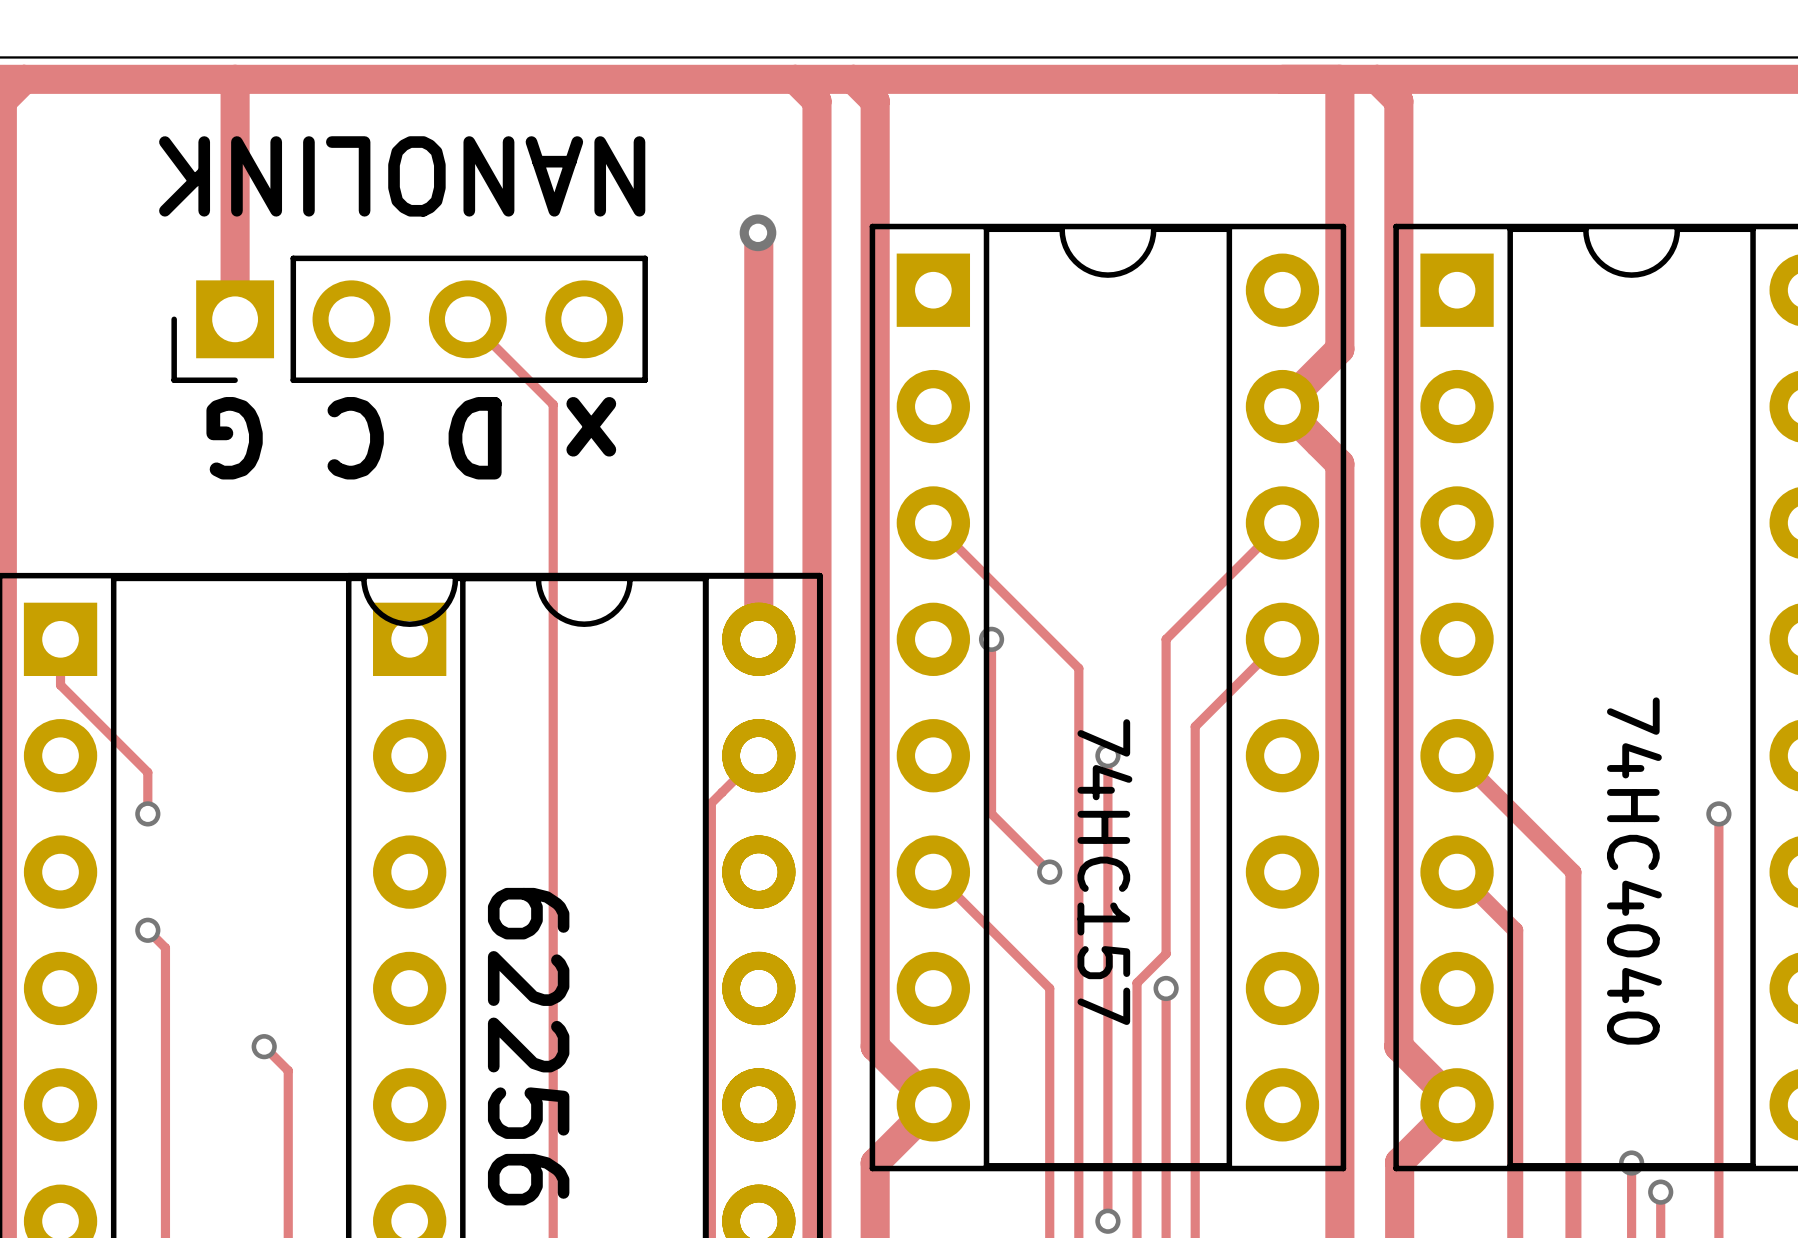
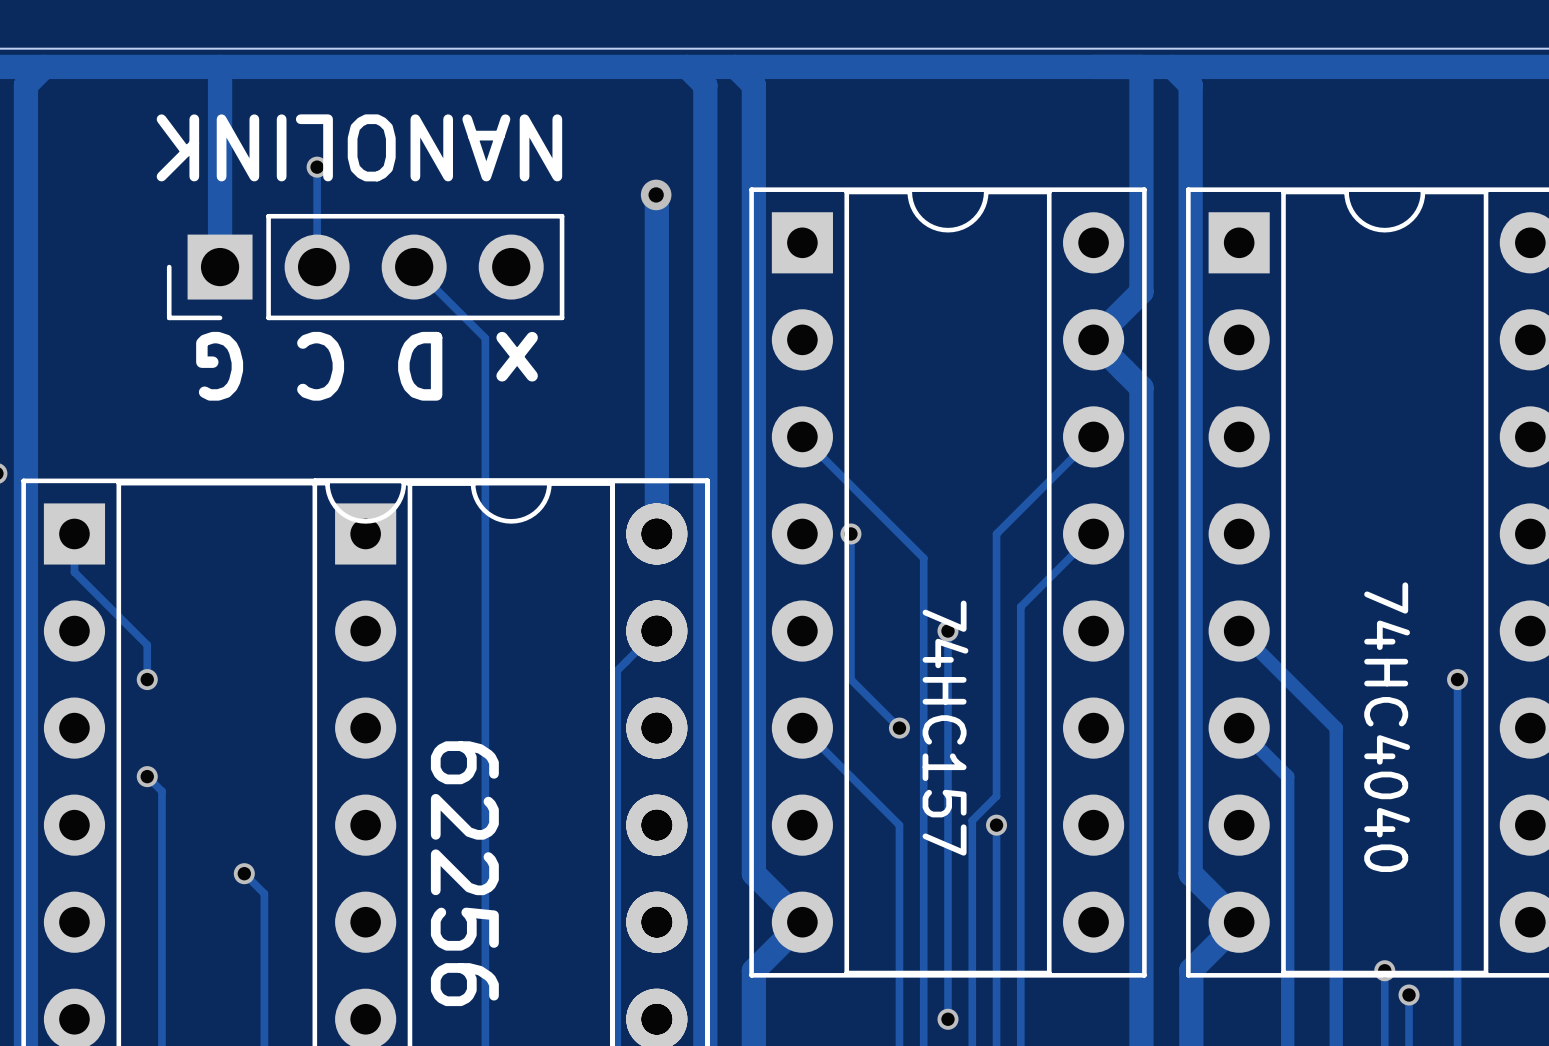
track: none -> (317, 167) (317, 267)
via: none -> (317, 167)

